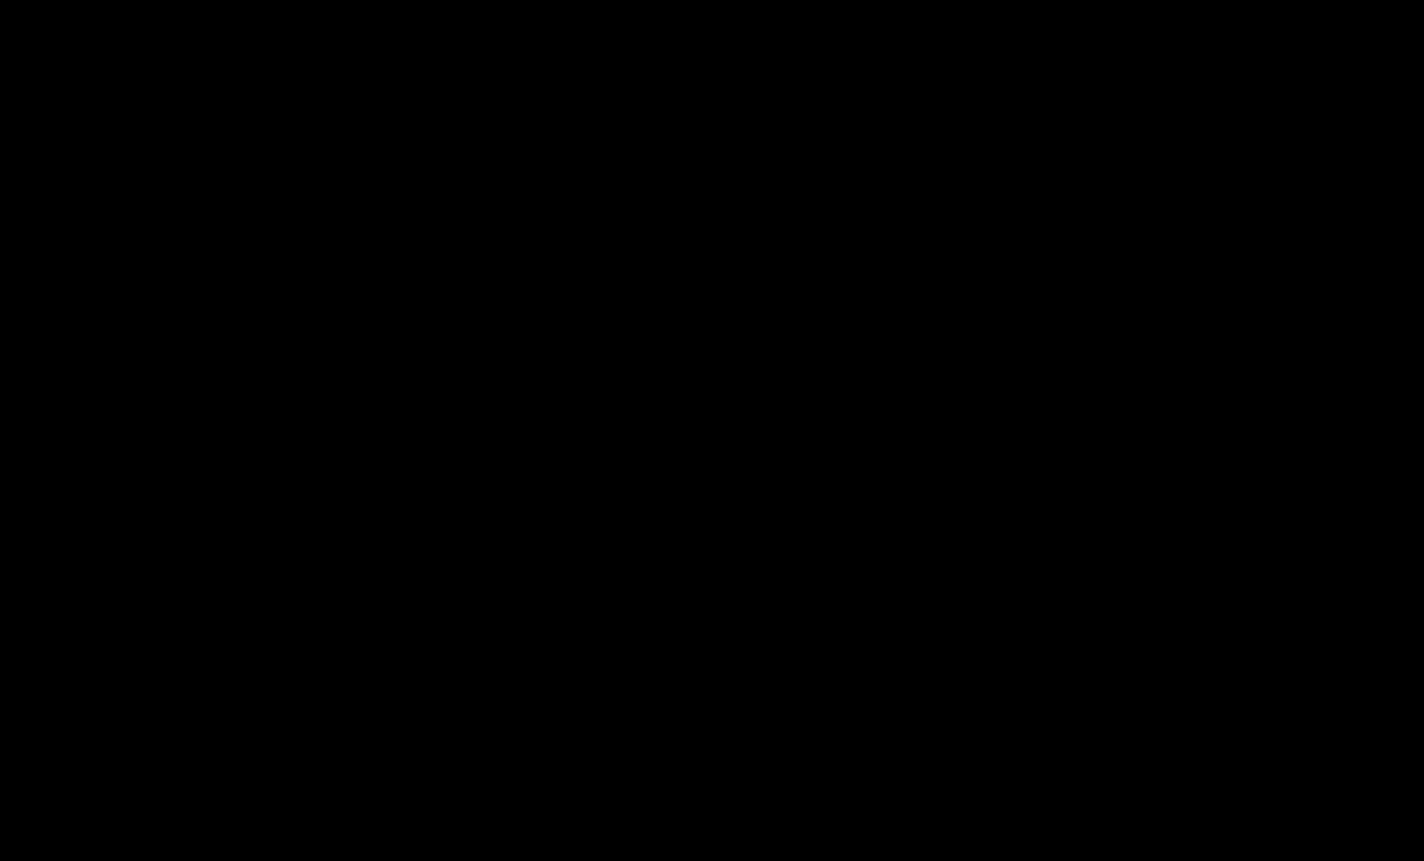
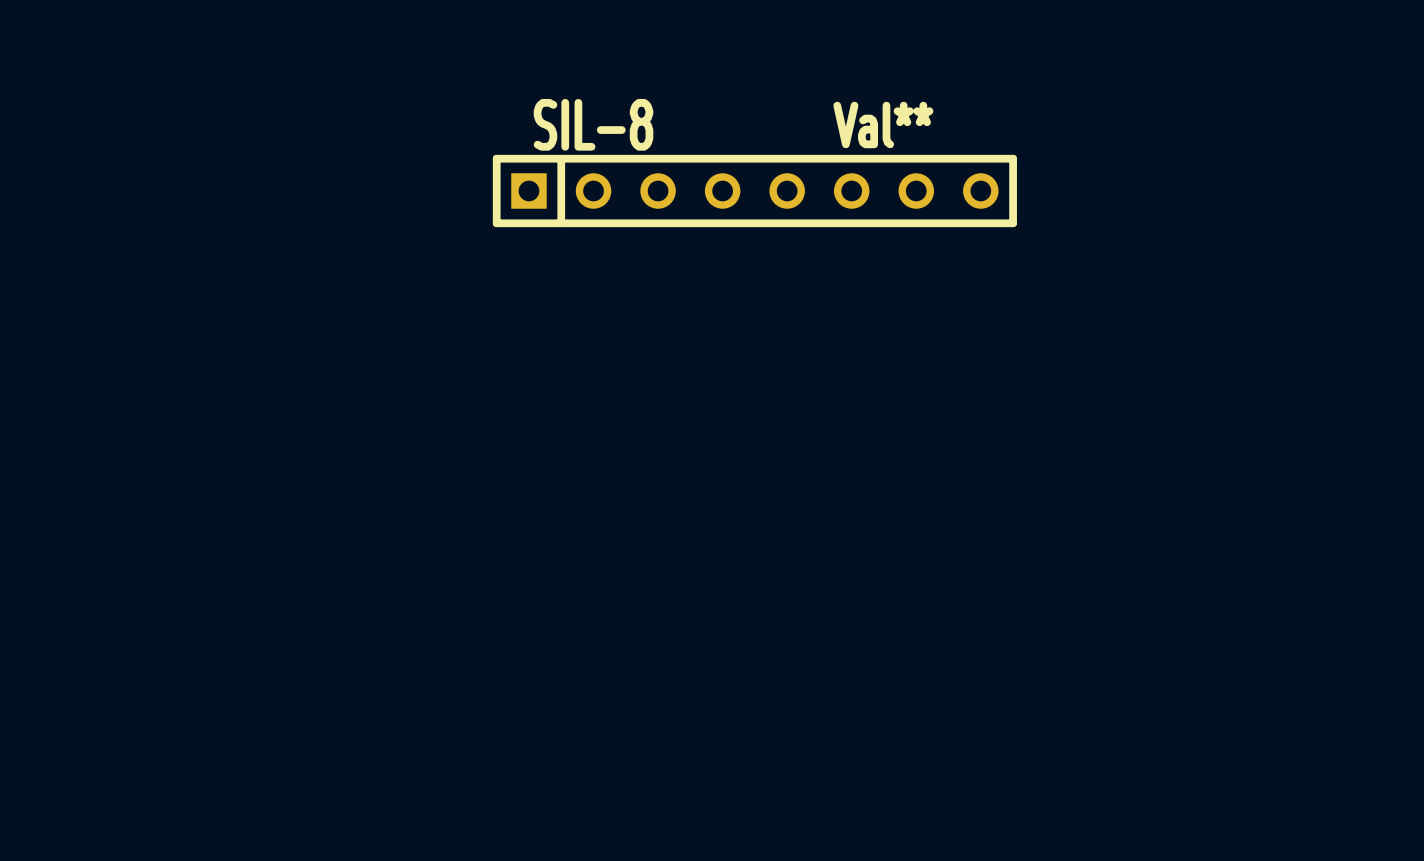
SIL-8: none -> Val** (754, 191)

